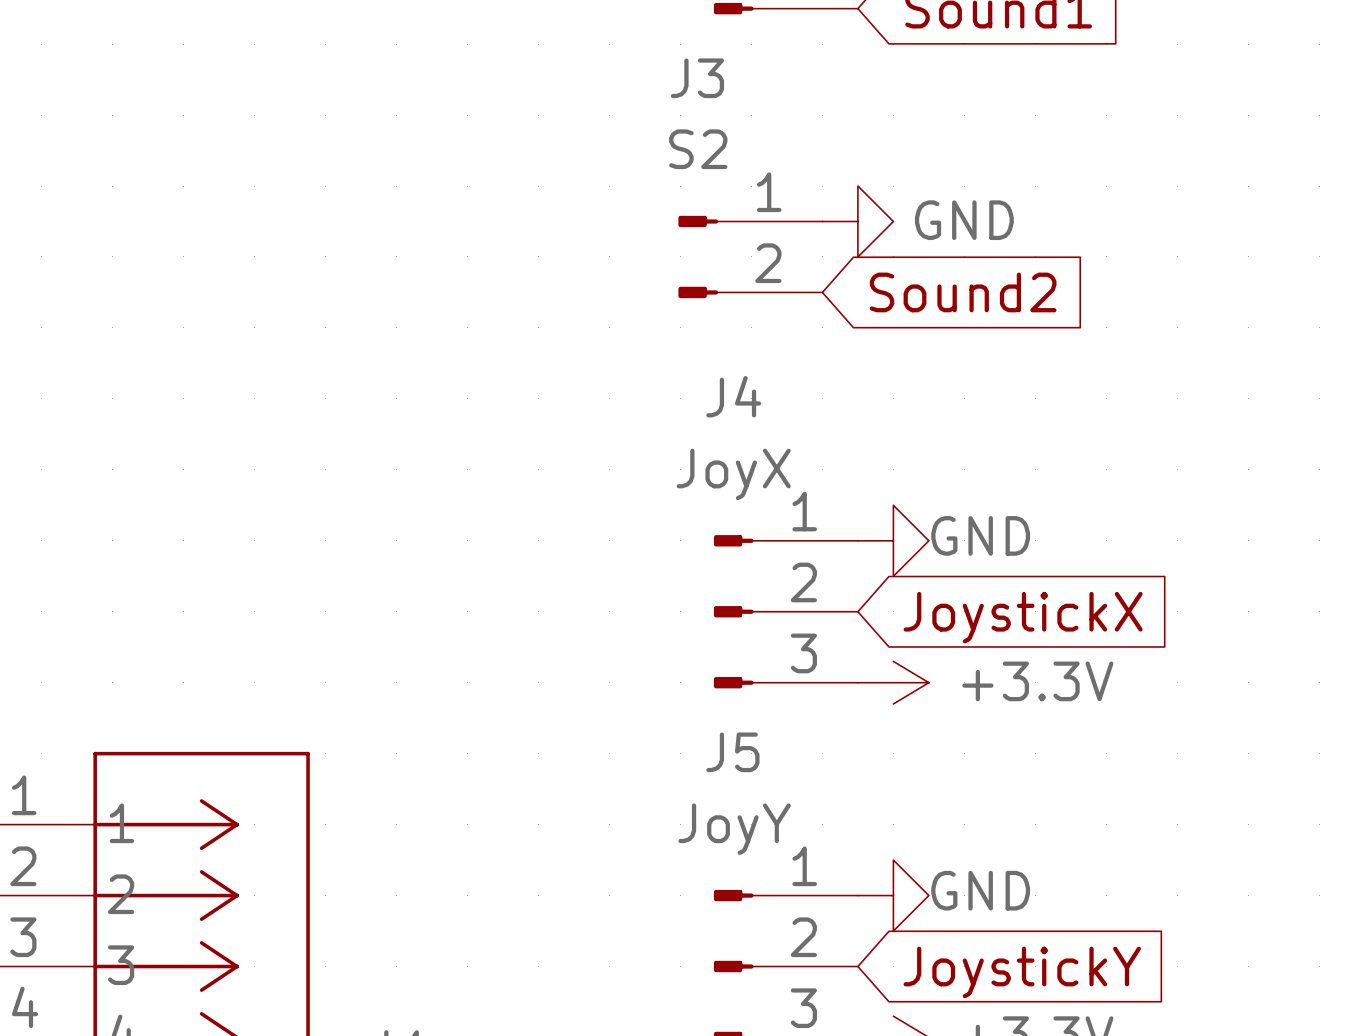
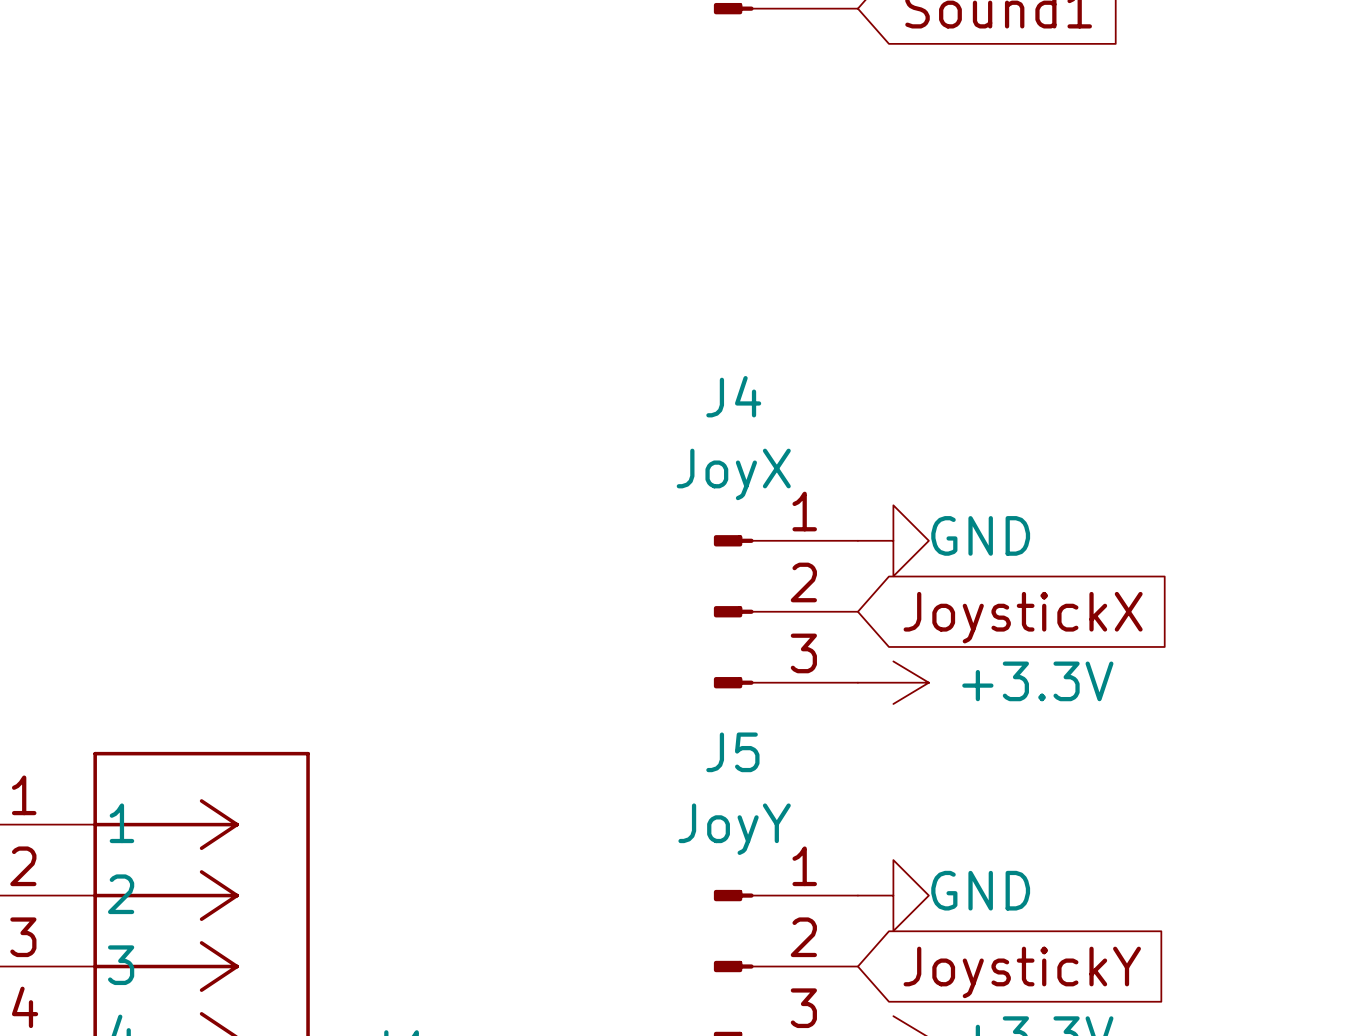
power symbol: GND (857, 221) -> none
J3: S2 (750, 256) -> none
global label: Sound2 (963, 292) -> none

